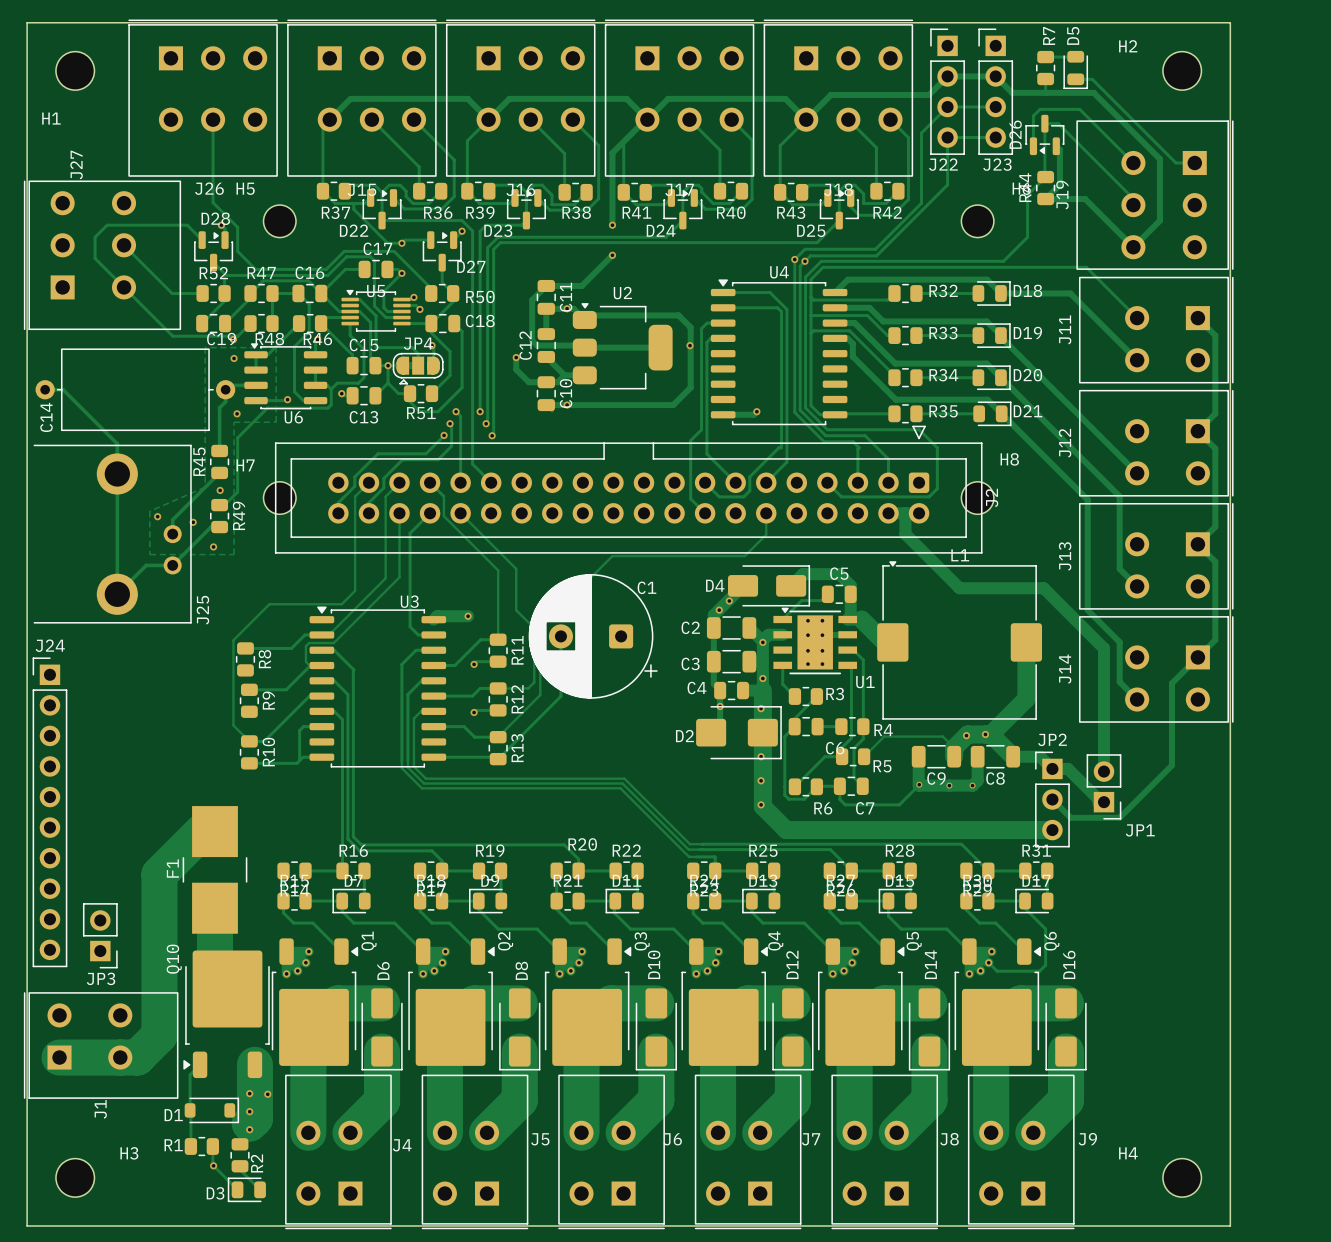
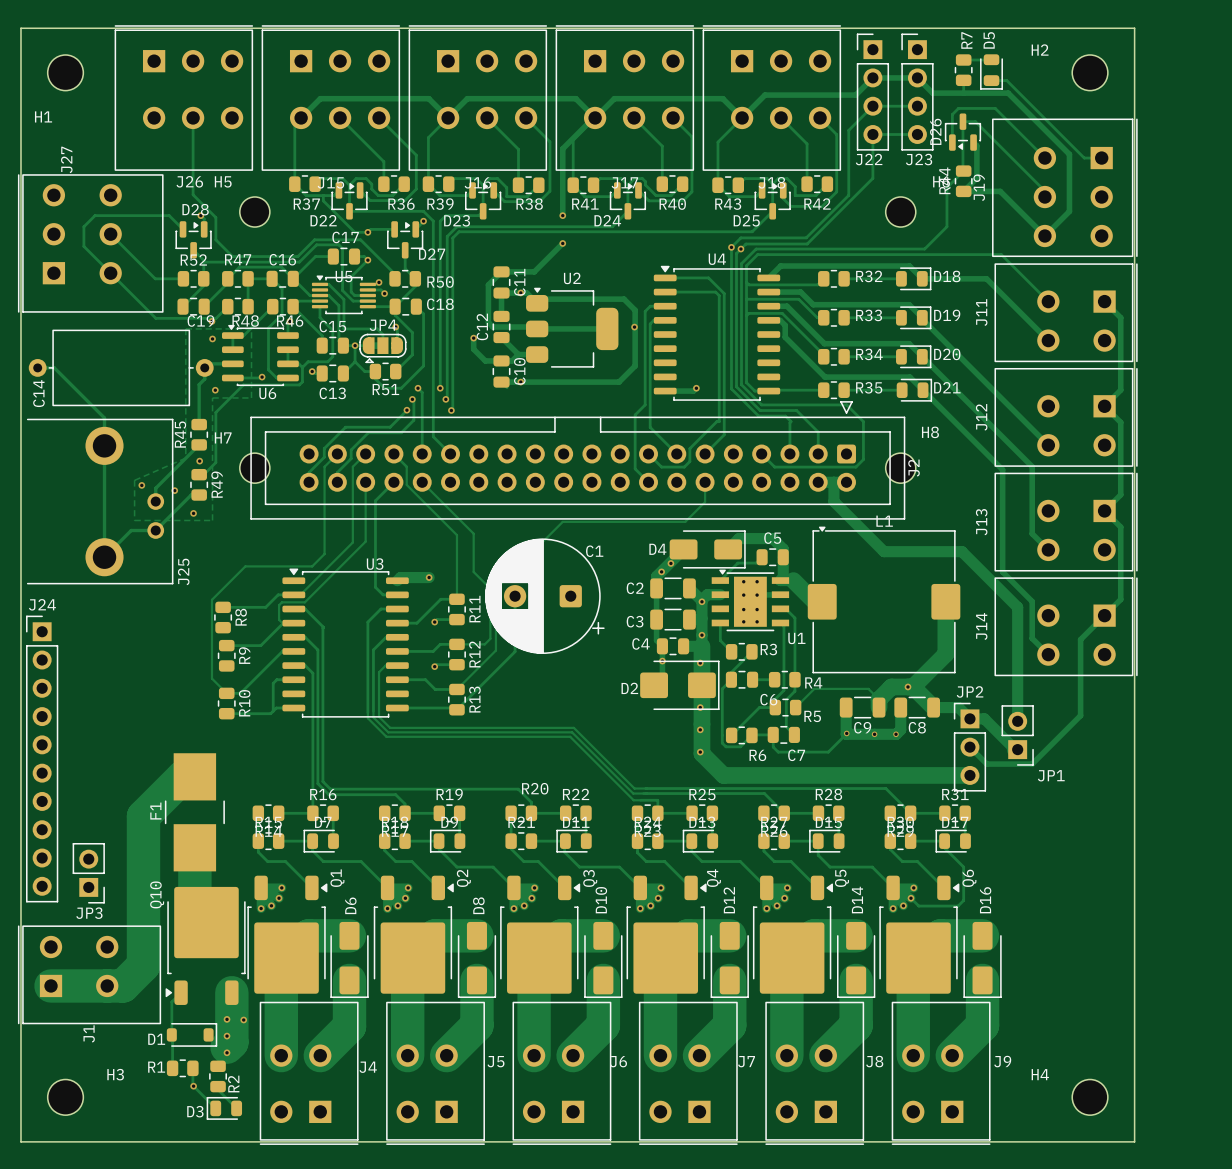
via: (966, 735) -> none

